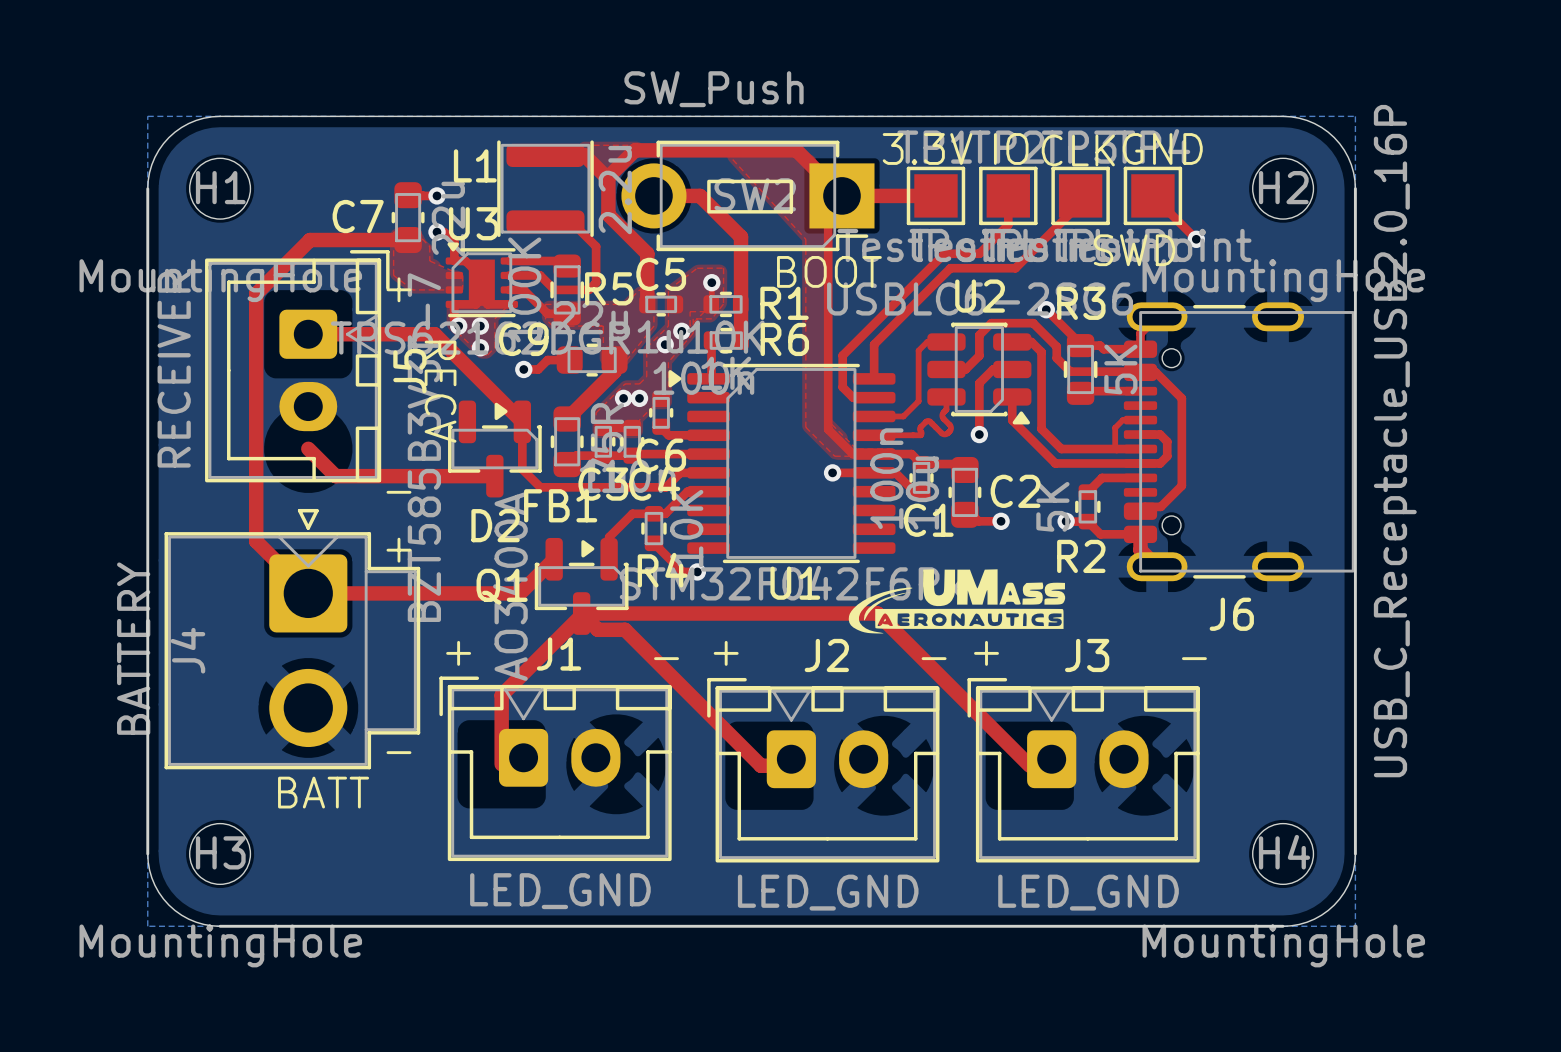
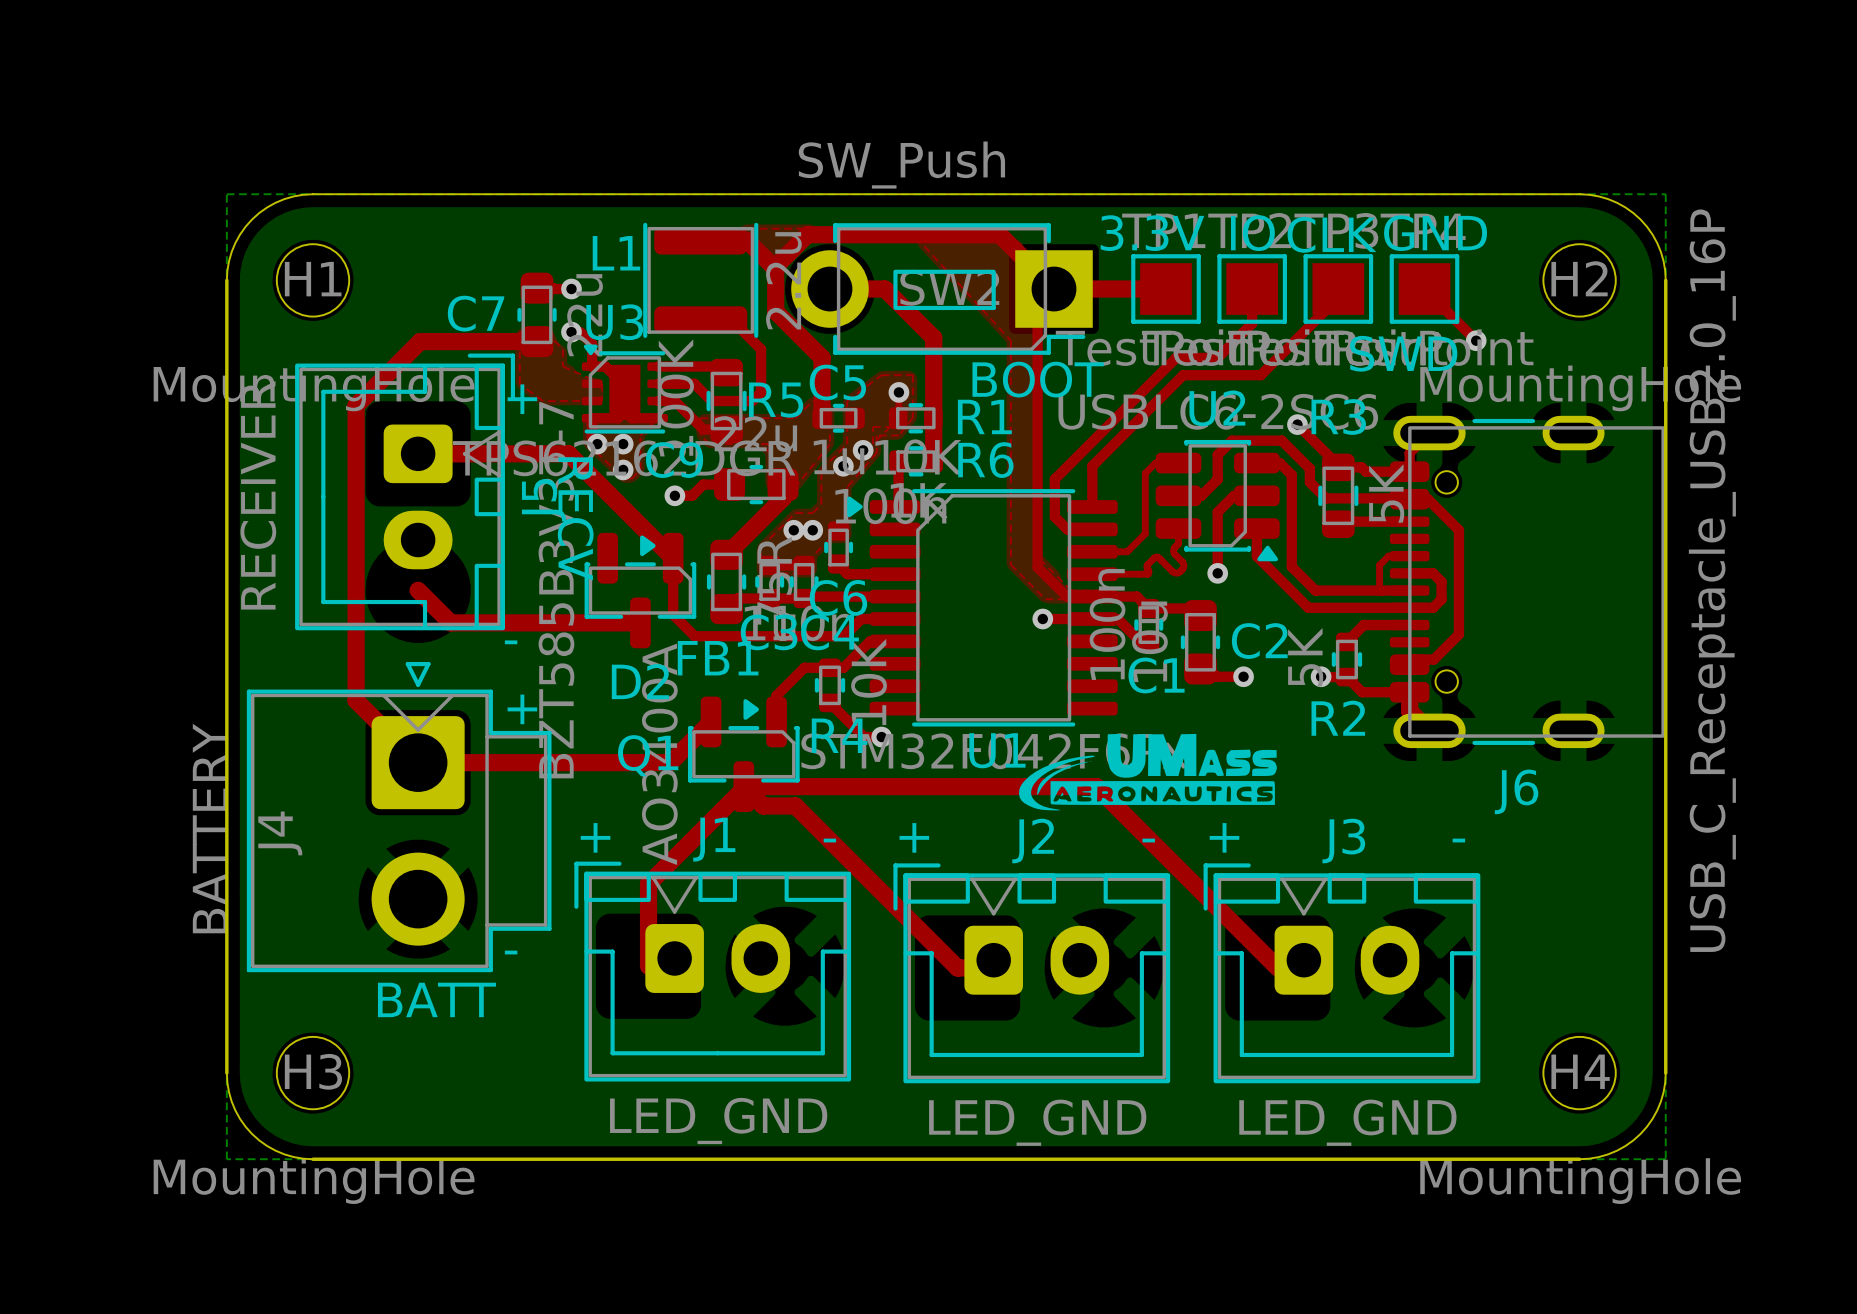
drawing position: (956, 601) -> (1147, 772)

